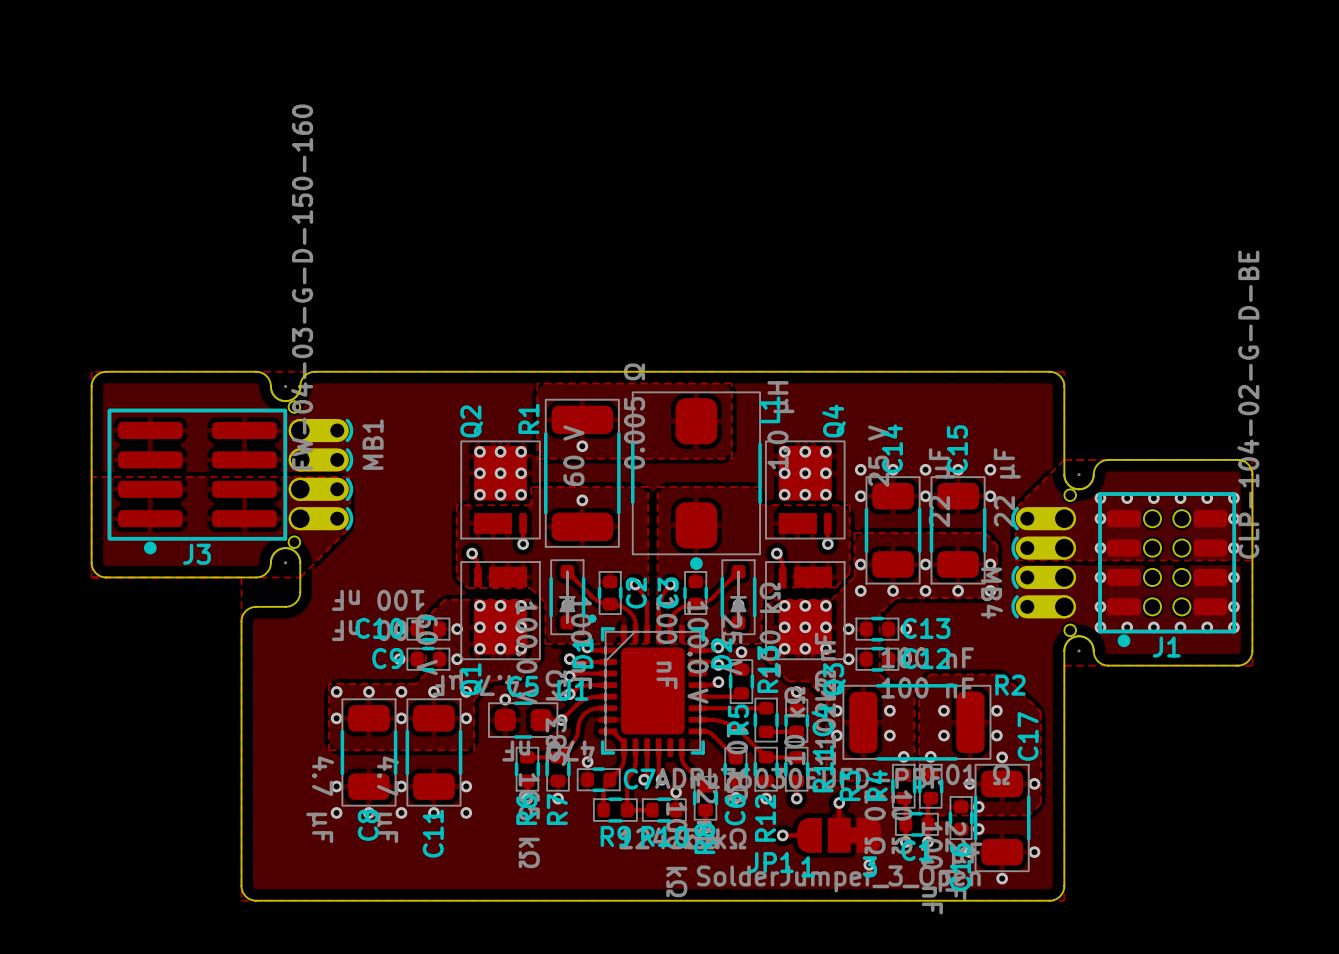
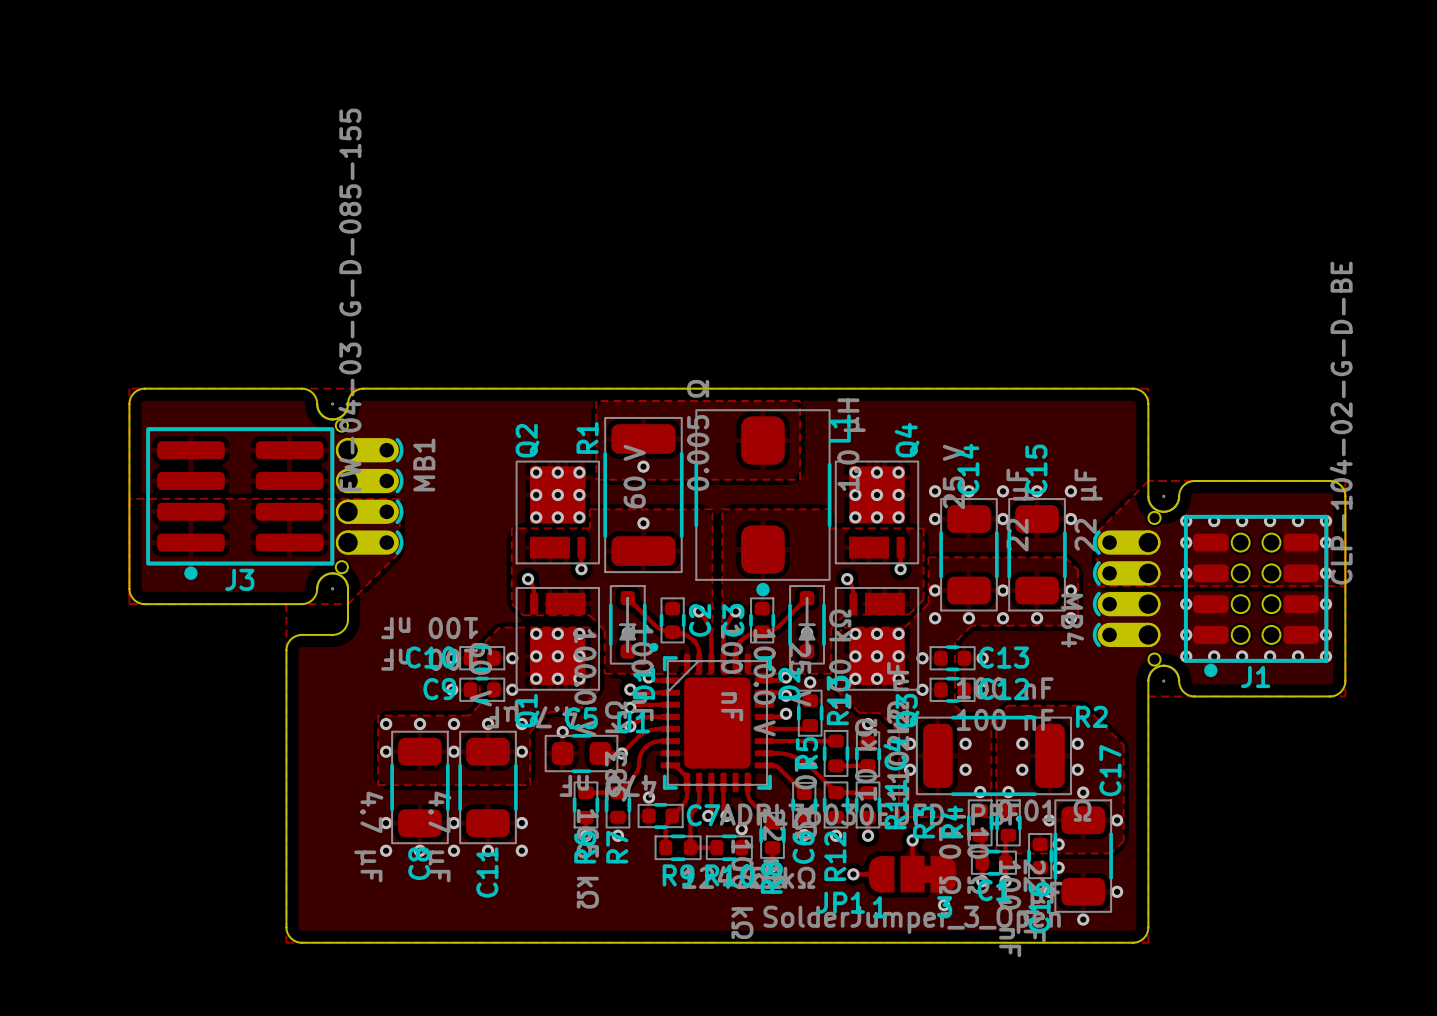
J3 value: FW-04-03-G-D-150-160 (302, 287) -> FW-04-03-G-D-085-155 (349, 300)

